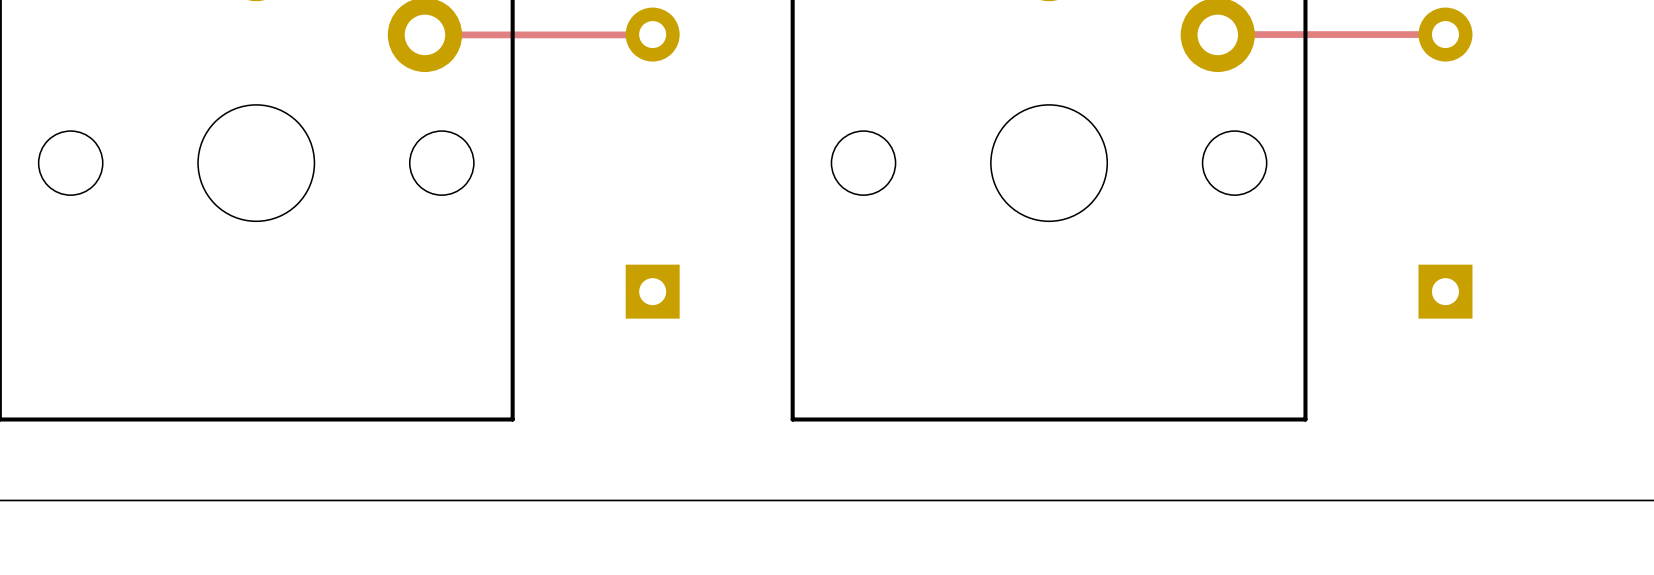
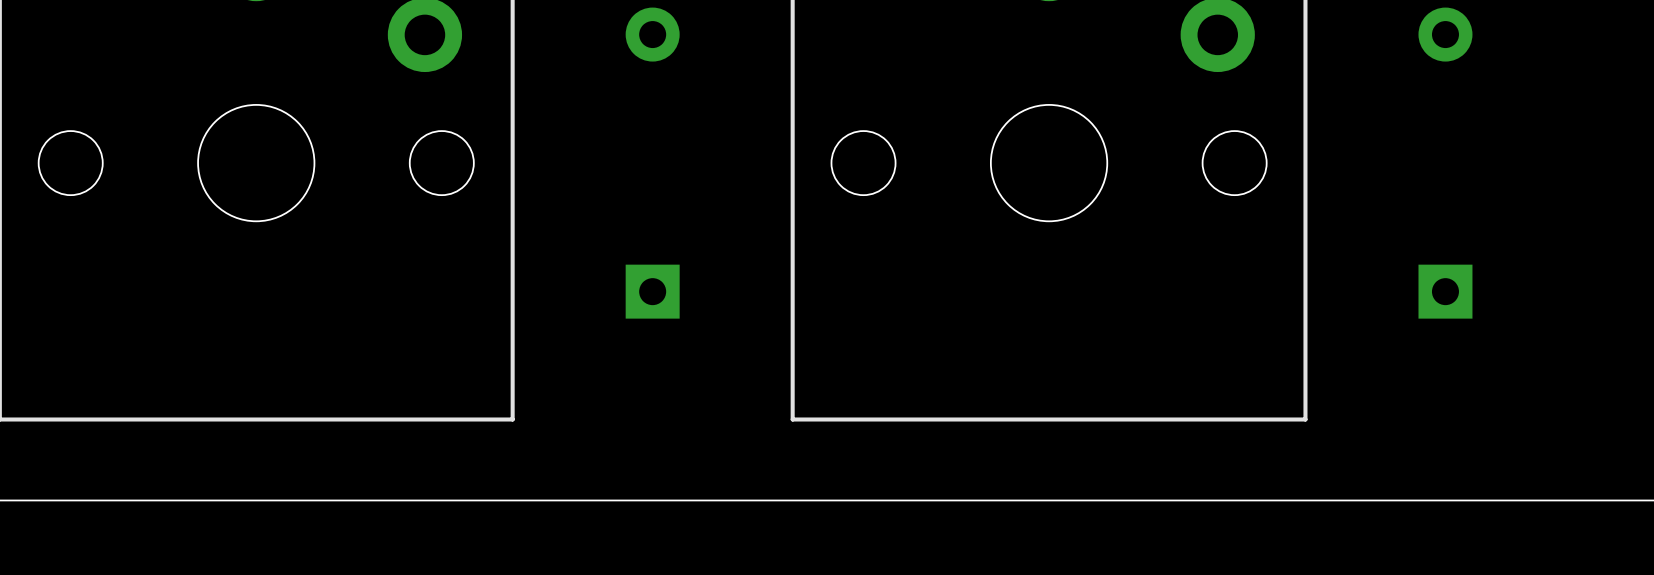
top track: (424, 34) (652, 34) -> none
top track: (1218, 34) (1445, 34) -> none

